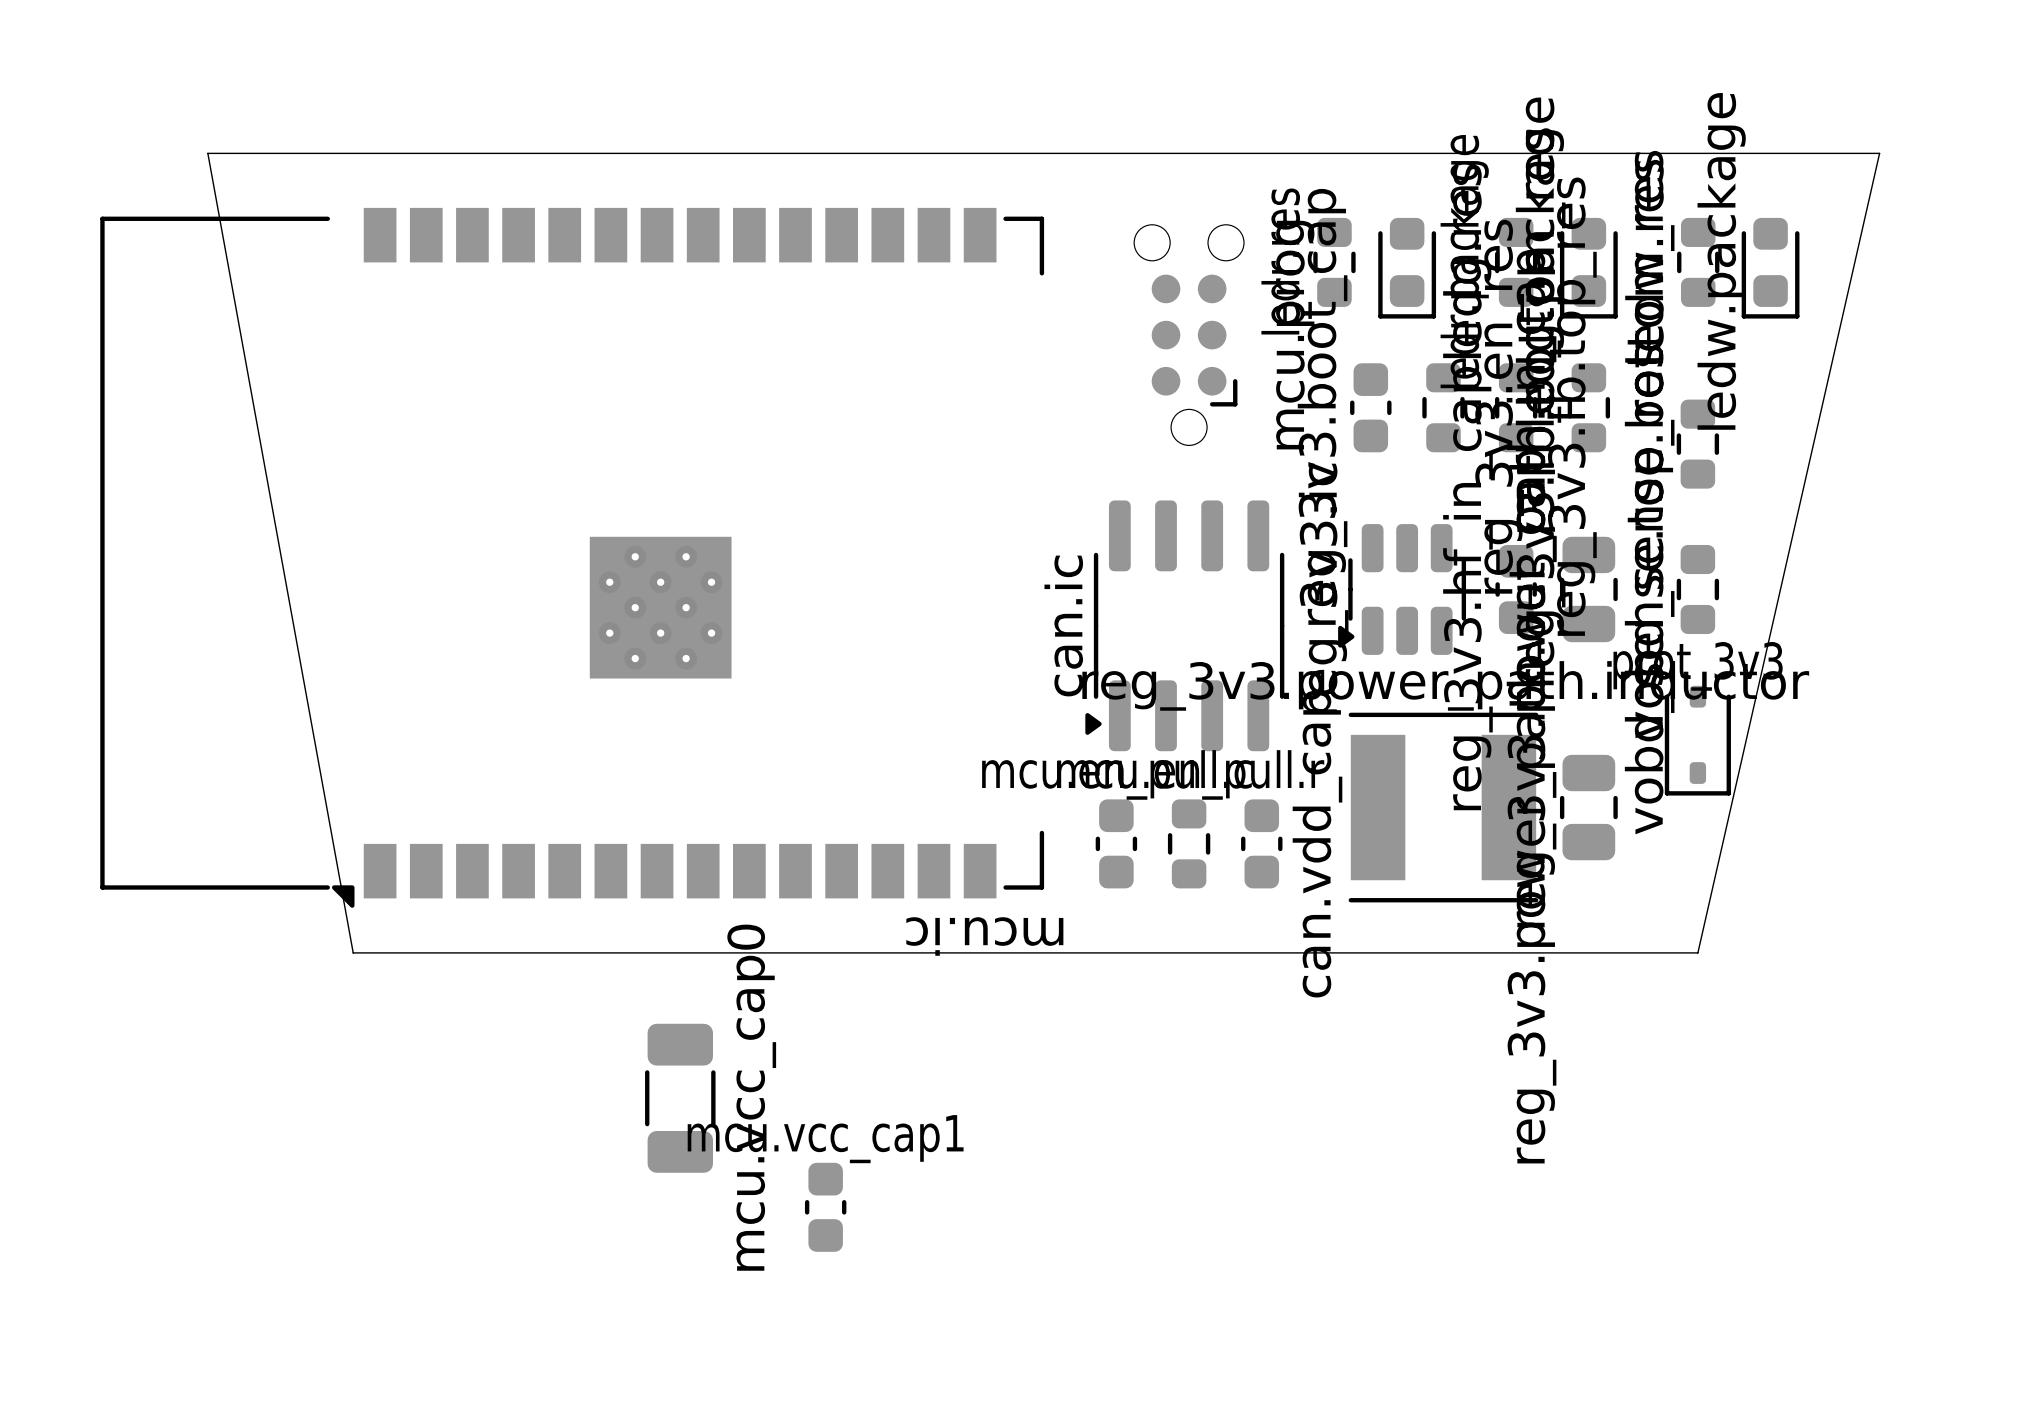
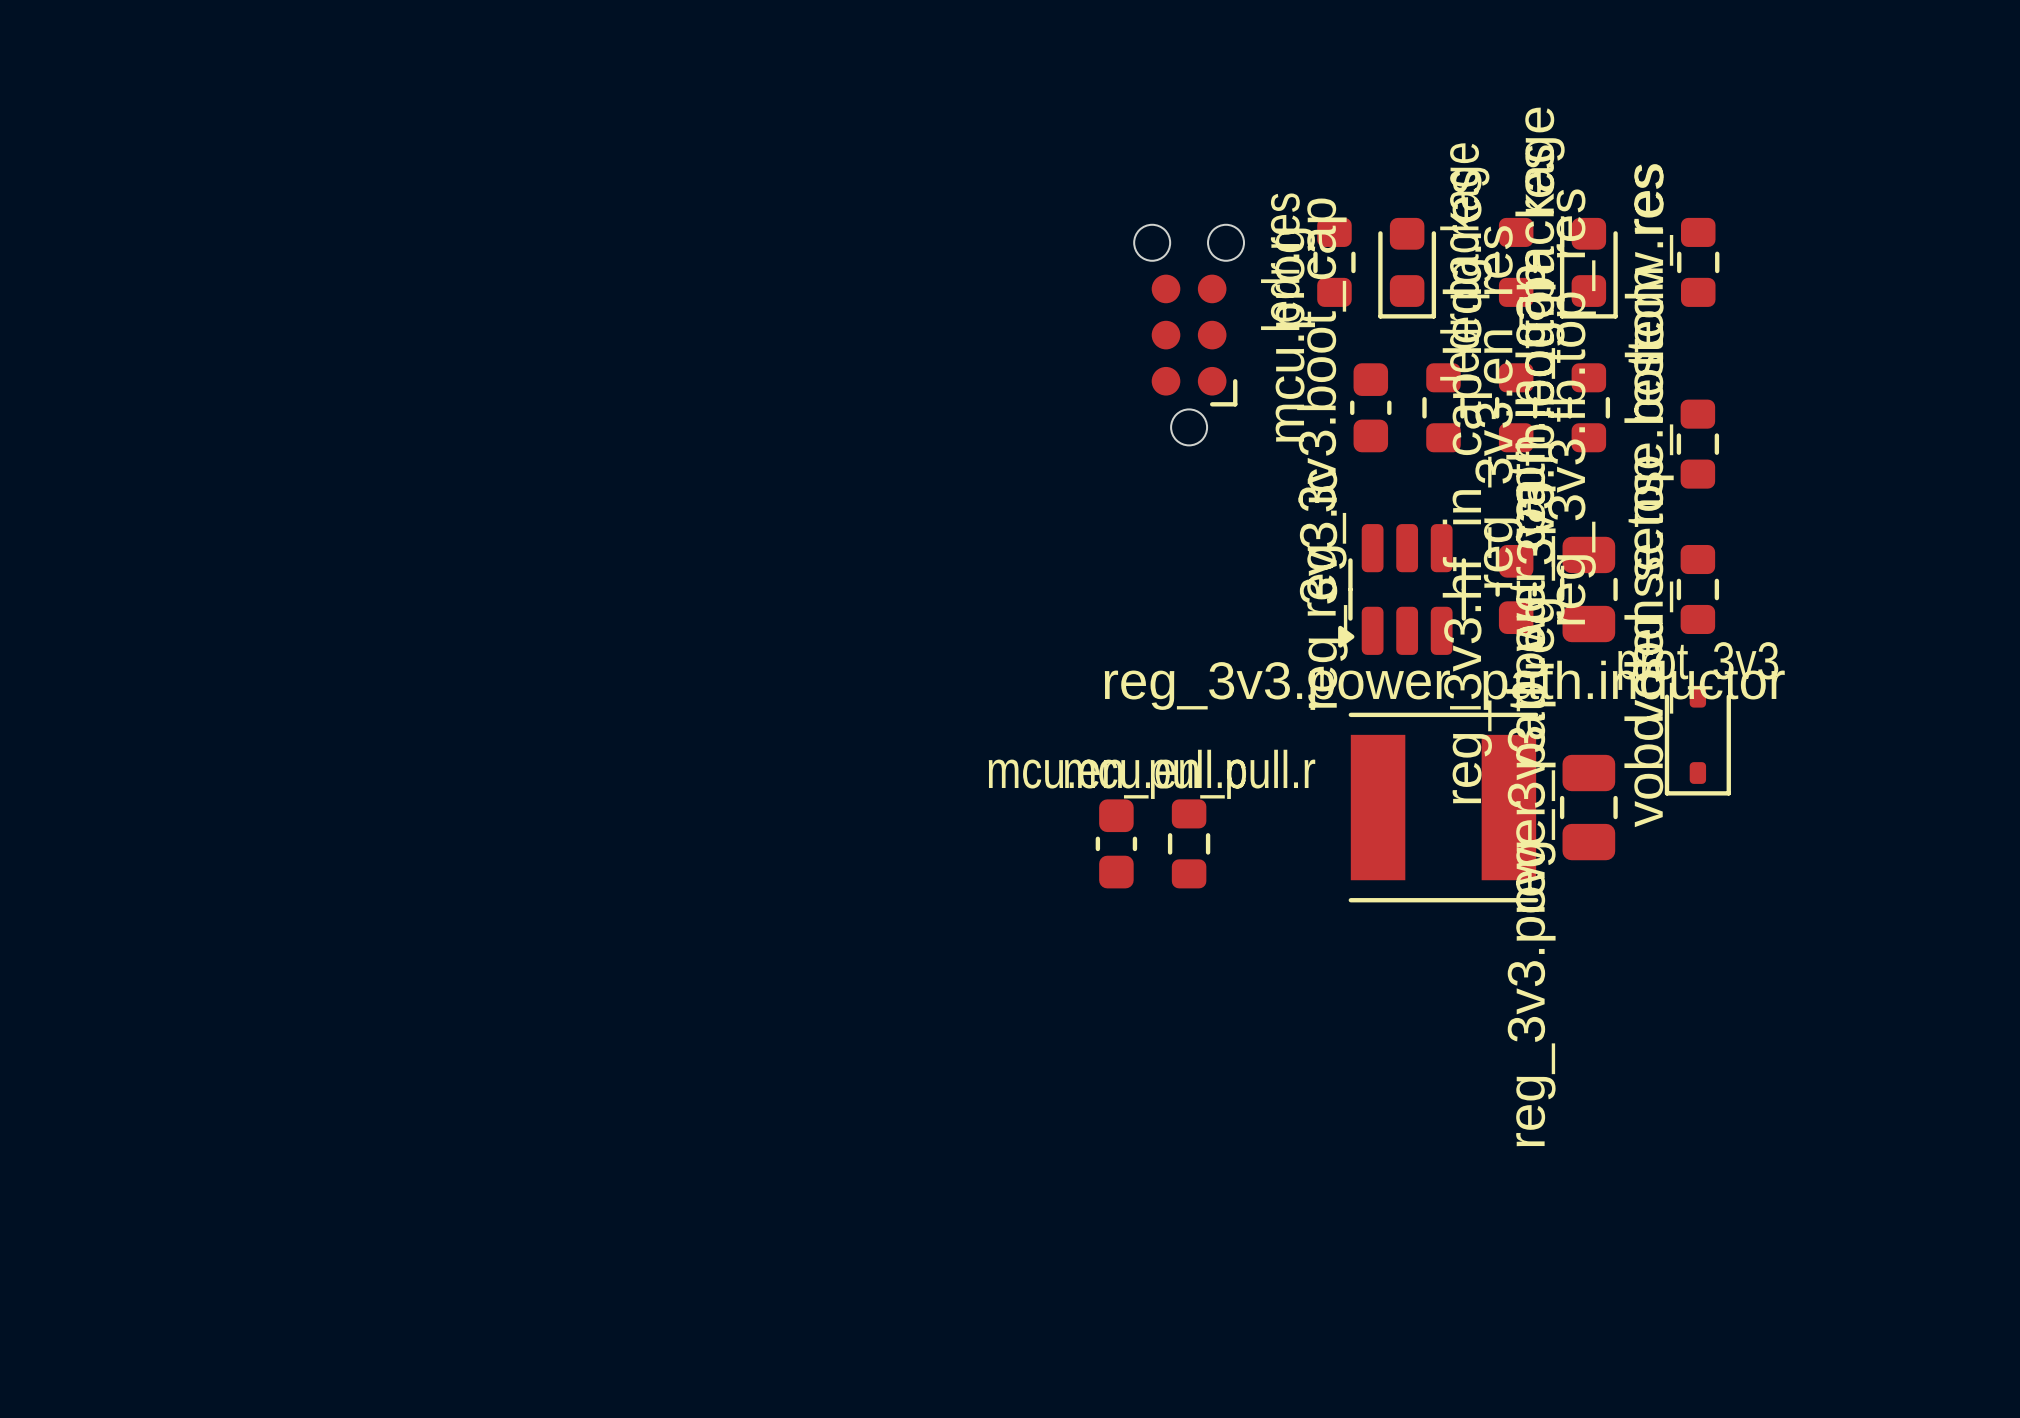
board edge: (207, 153) (353, 952) (1697, 952) (1879, 153) (207, 153) -> none
ledw.package: (1770, 268) -> none
mcu.ic: (572, 557) -> none
can.ic: (1184, 625) -> none
can.vdd_cap: (1261, 843) -> none
mcu.vcc_cap0: (680, 1098) -> none
mcu.vcc_cap1: (825, 1207) -> none

